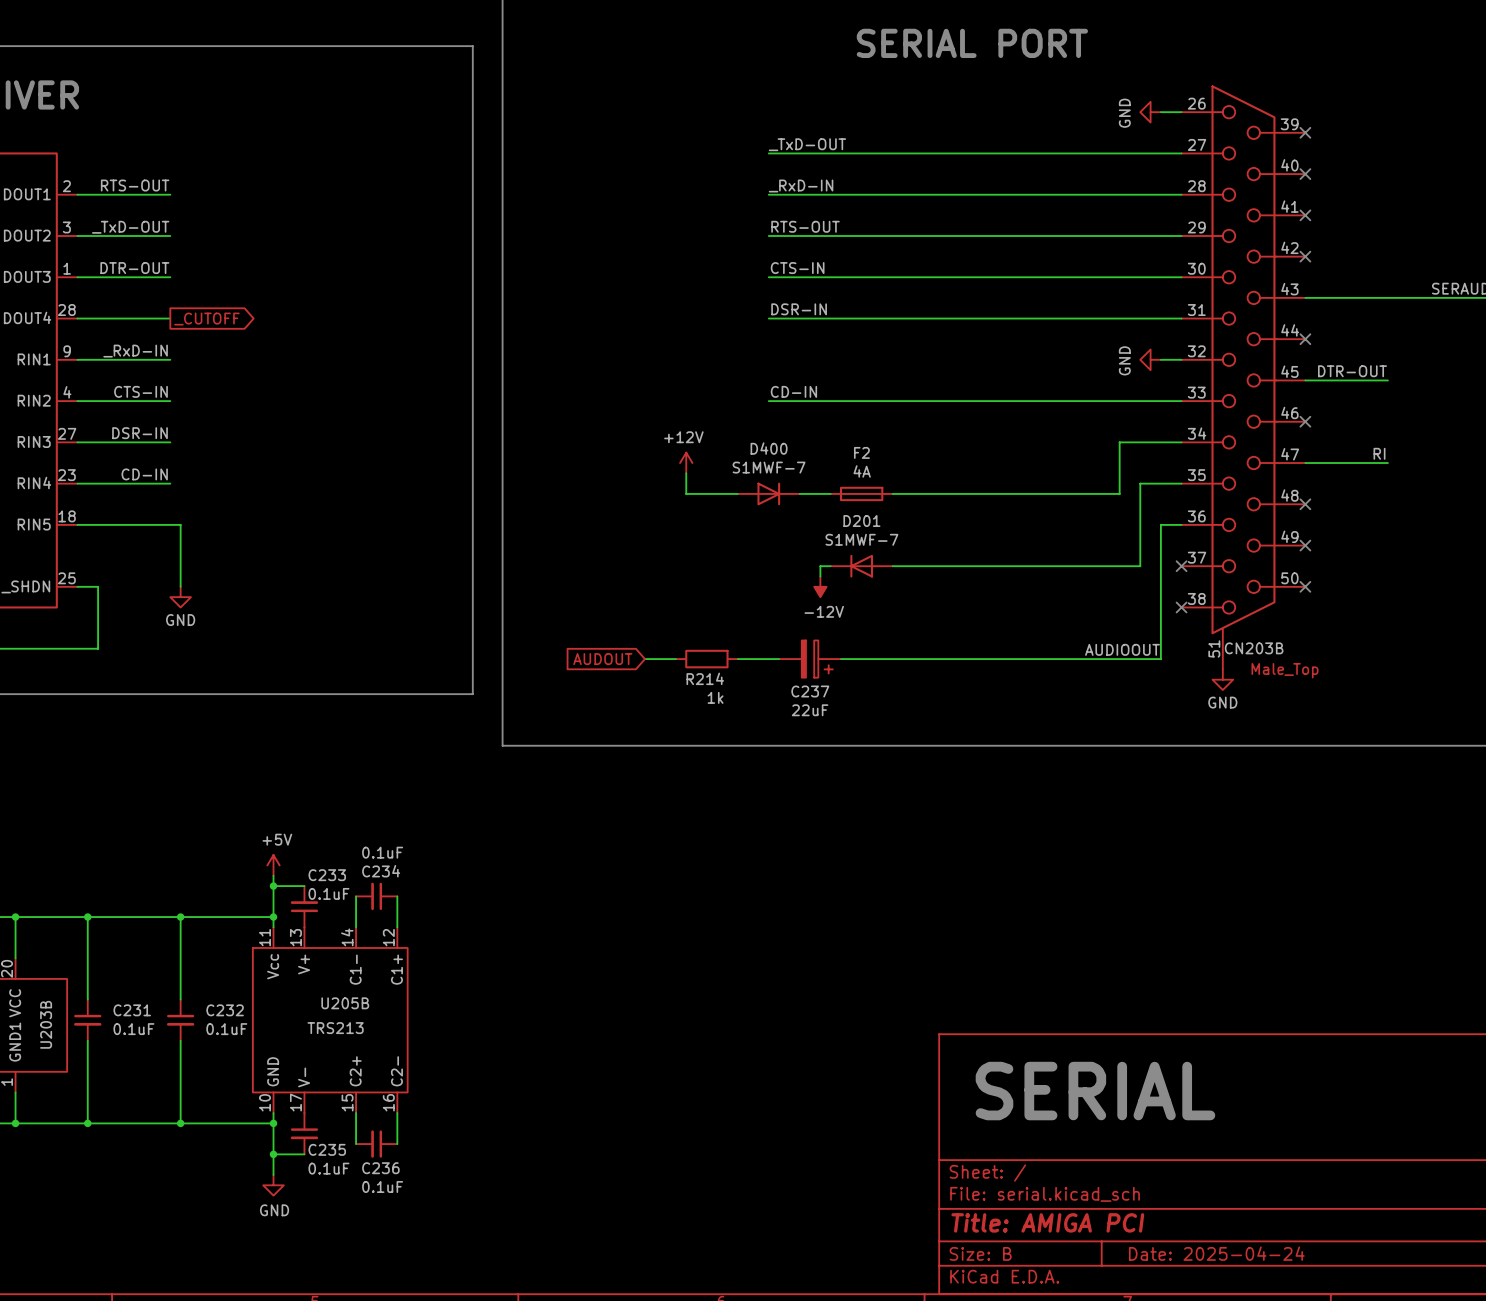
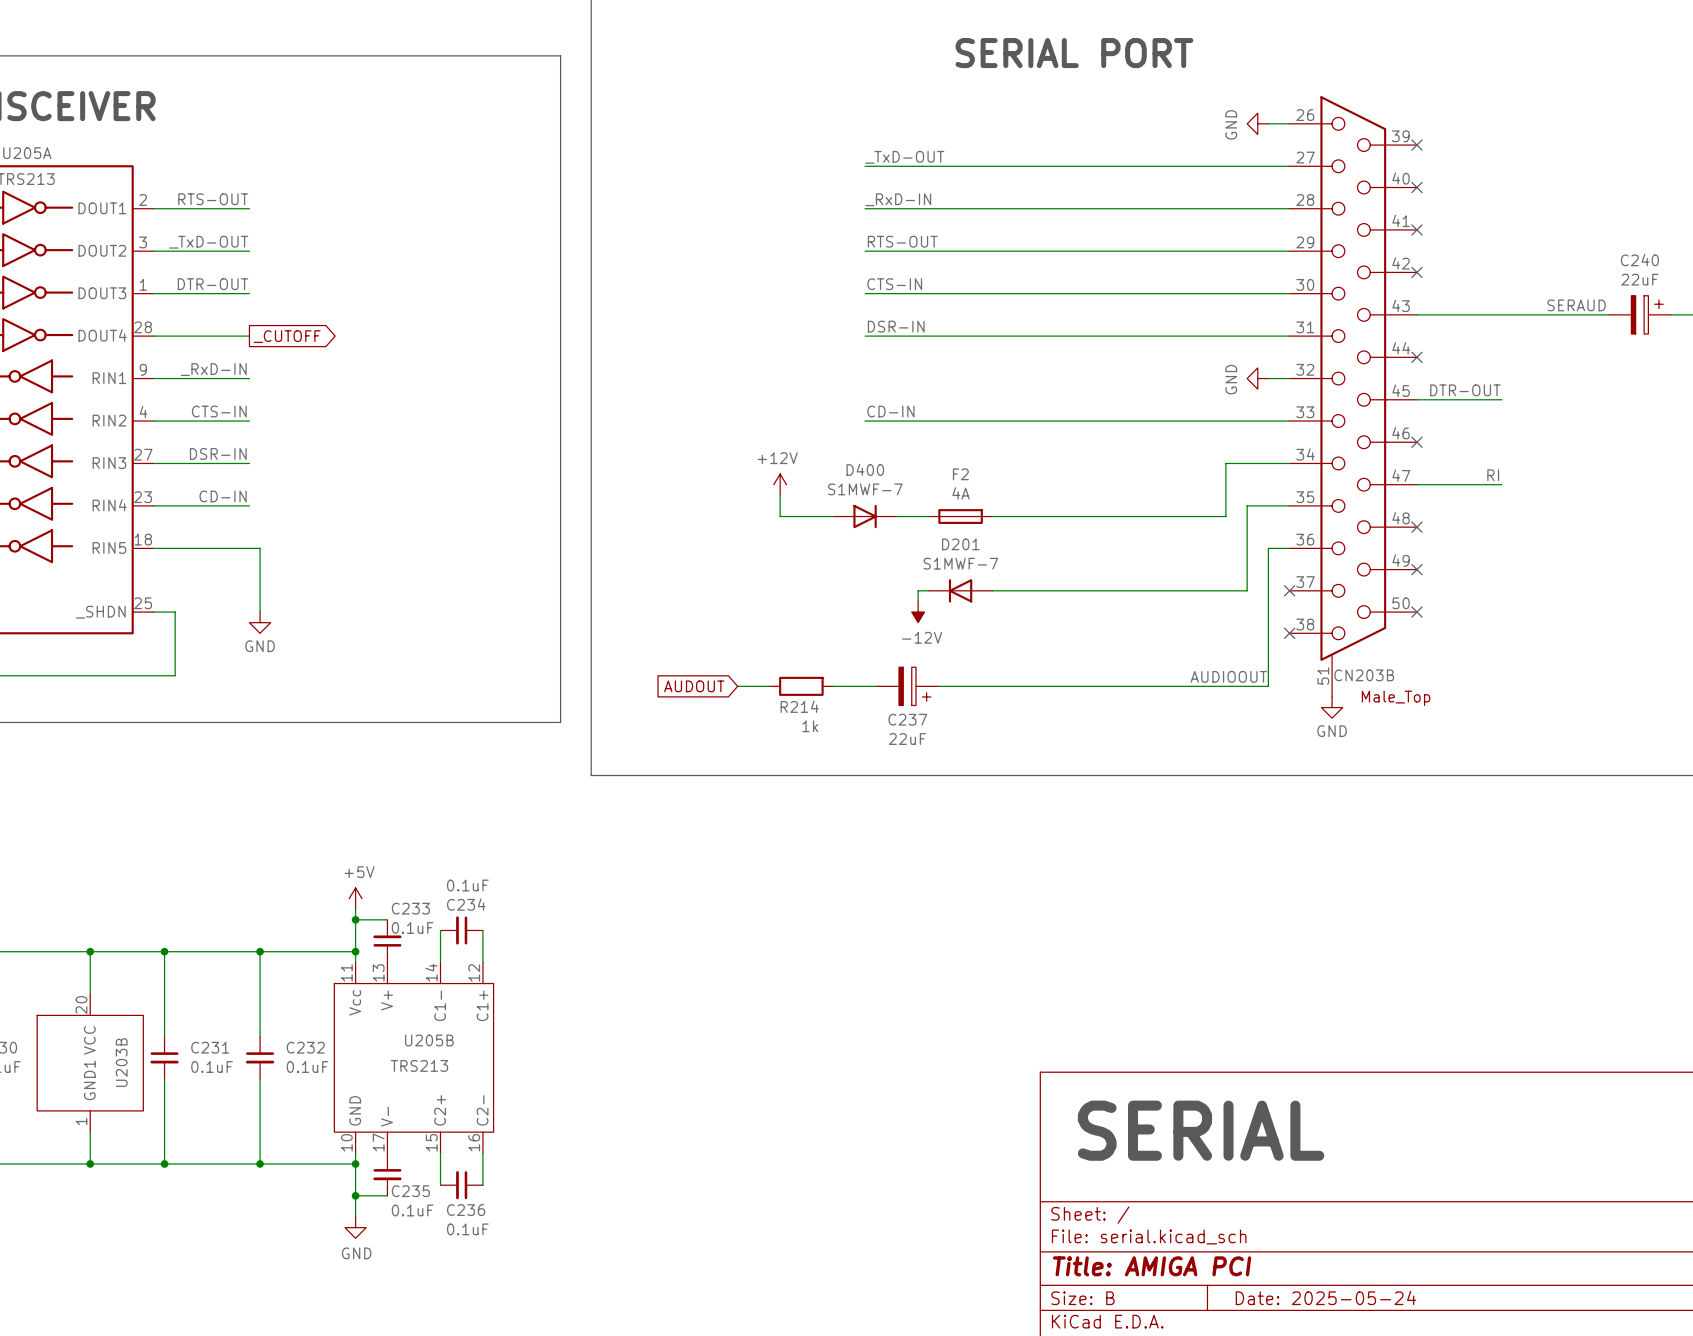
title block: Date: 2025-04-24 (1216, 1253) -> Date: 2025-05-24 (1325, 1297)

